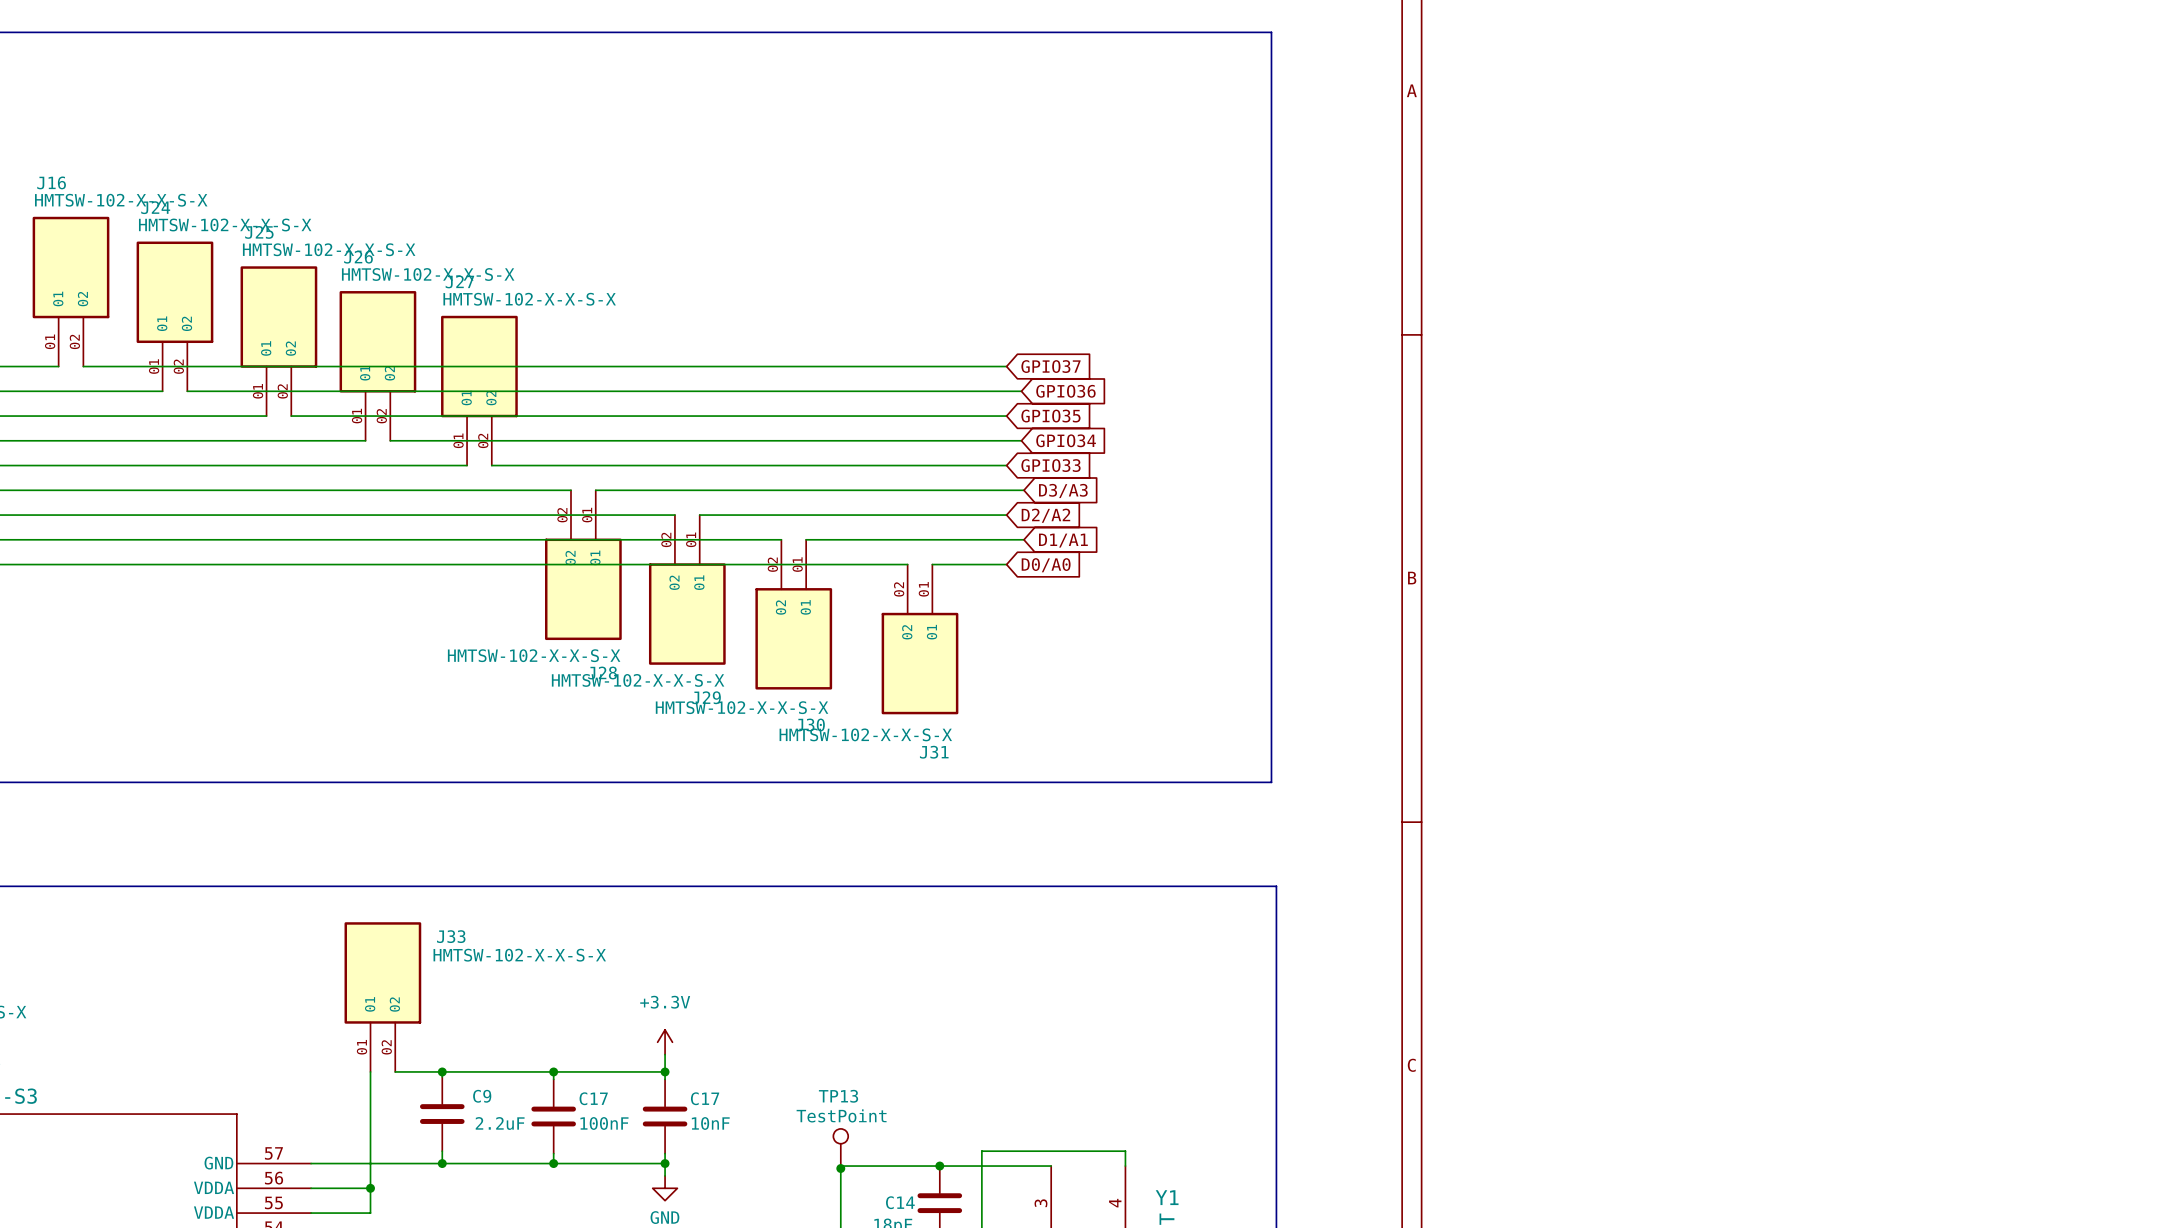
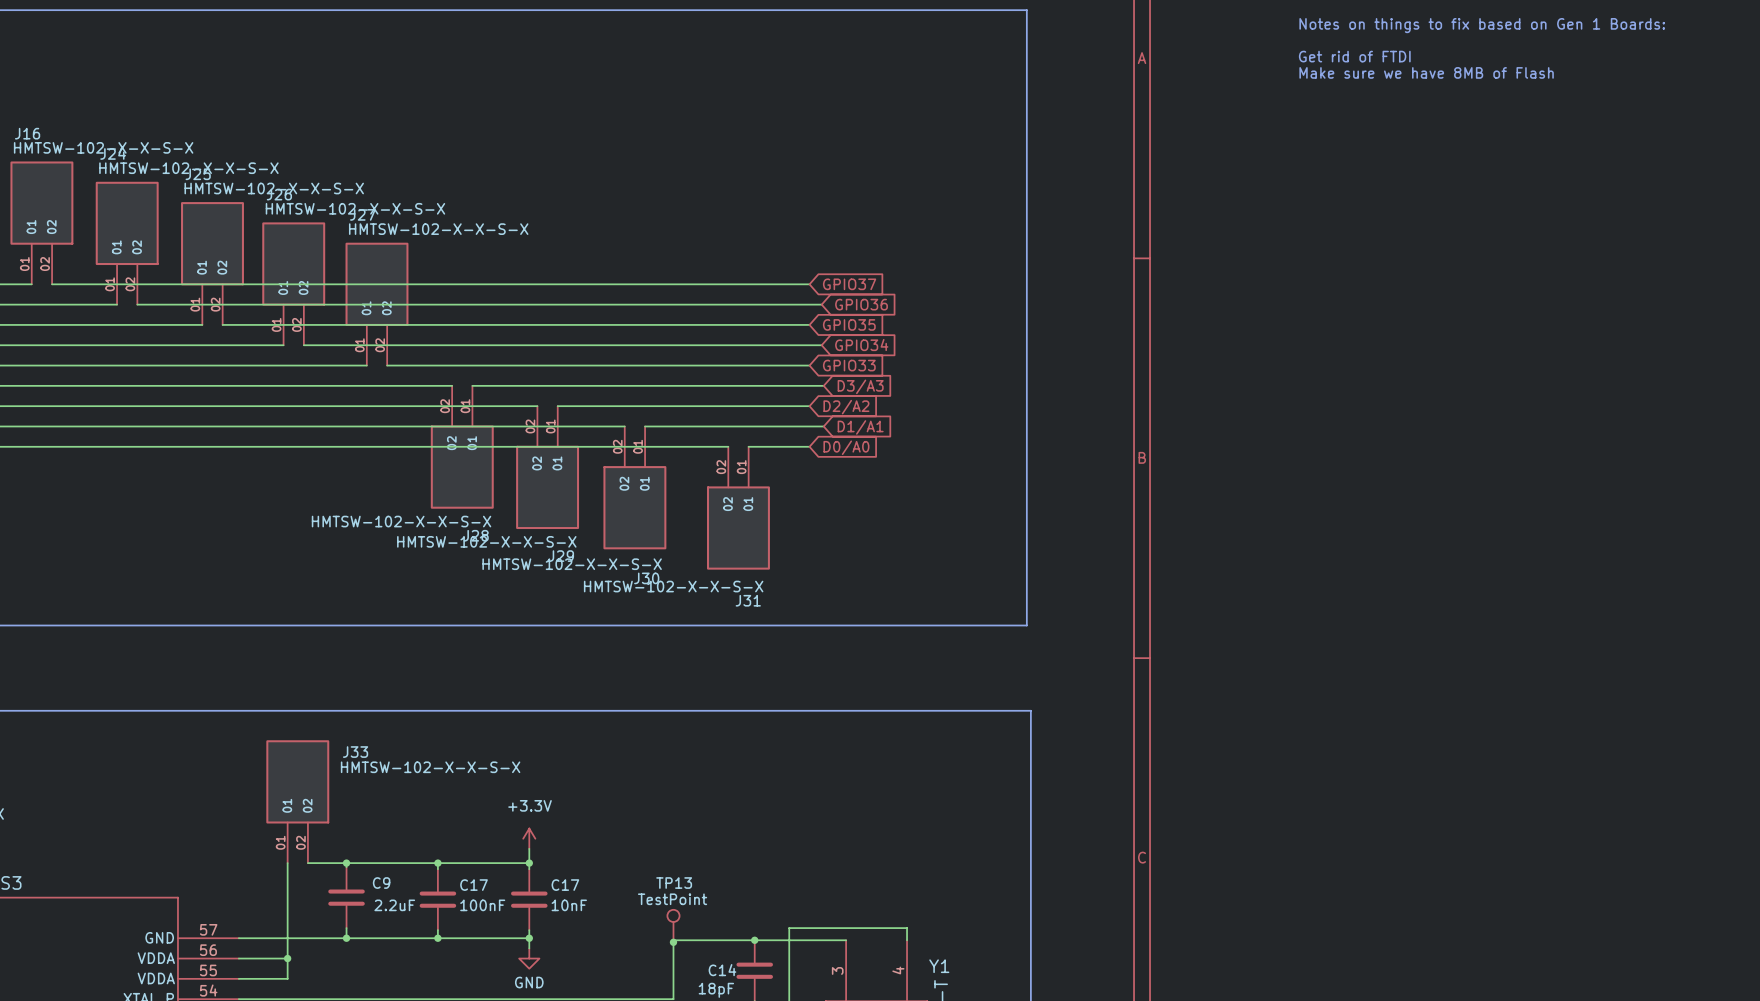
text: none -> Notes on things to fix based on Gen 1 Boards: (1482, 25)
text: none -> Get rid of FTDI (1354, 56)
text: none -> Make sure we have 8MB of Flash (1426, 72)

